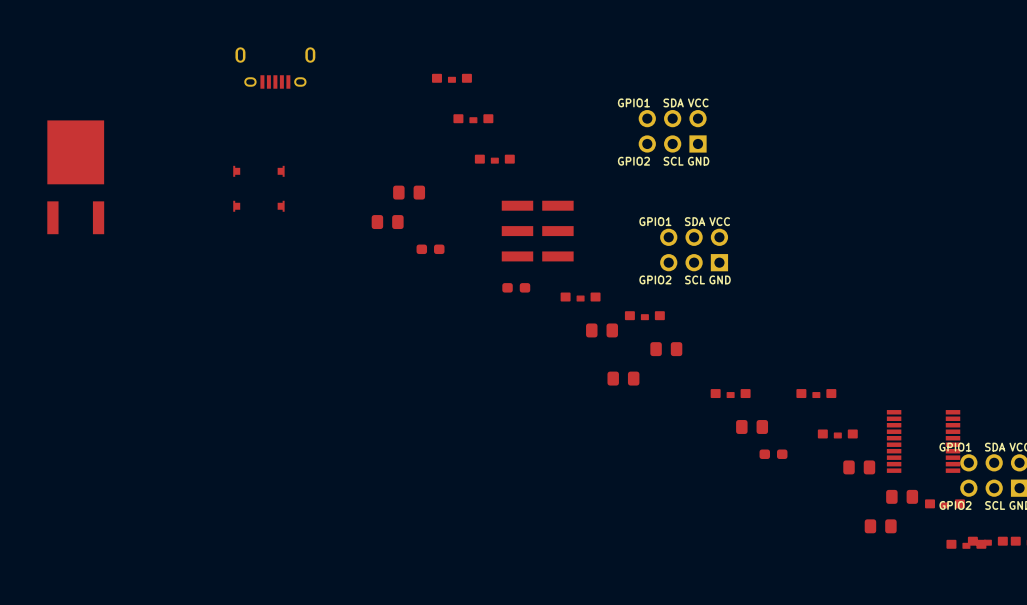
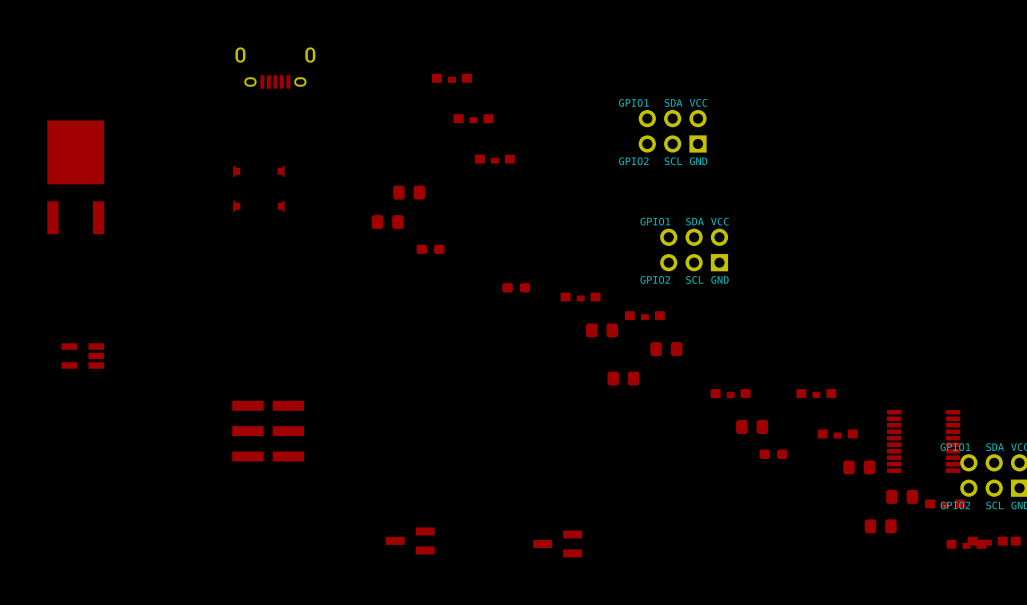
part: (537, 231) -> none
part: none -> (82, 356)
part: none -> (268, 431)
part: none -> (410, 540)
part: none -> (557, 543)

